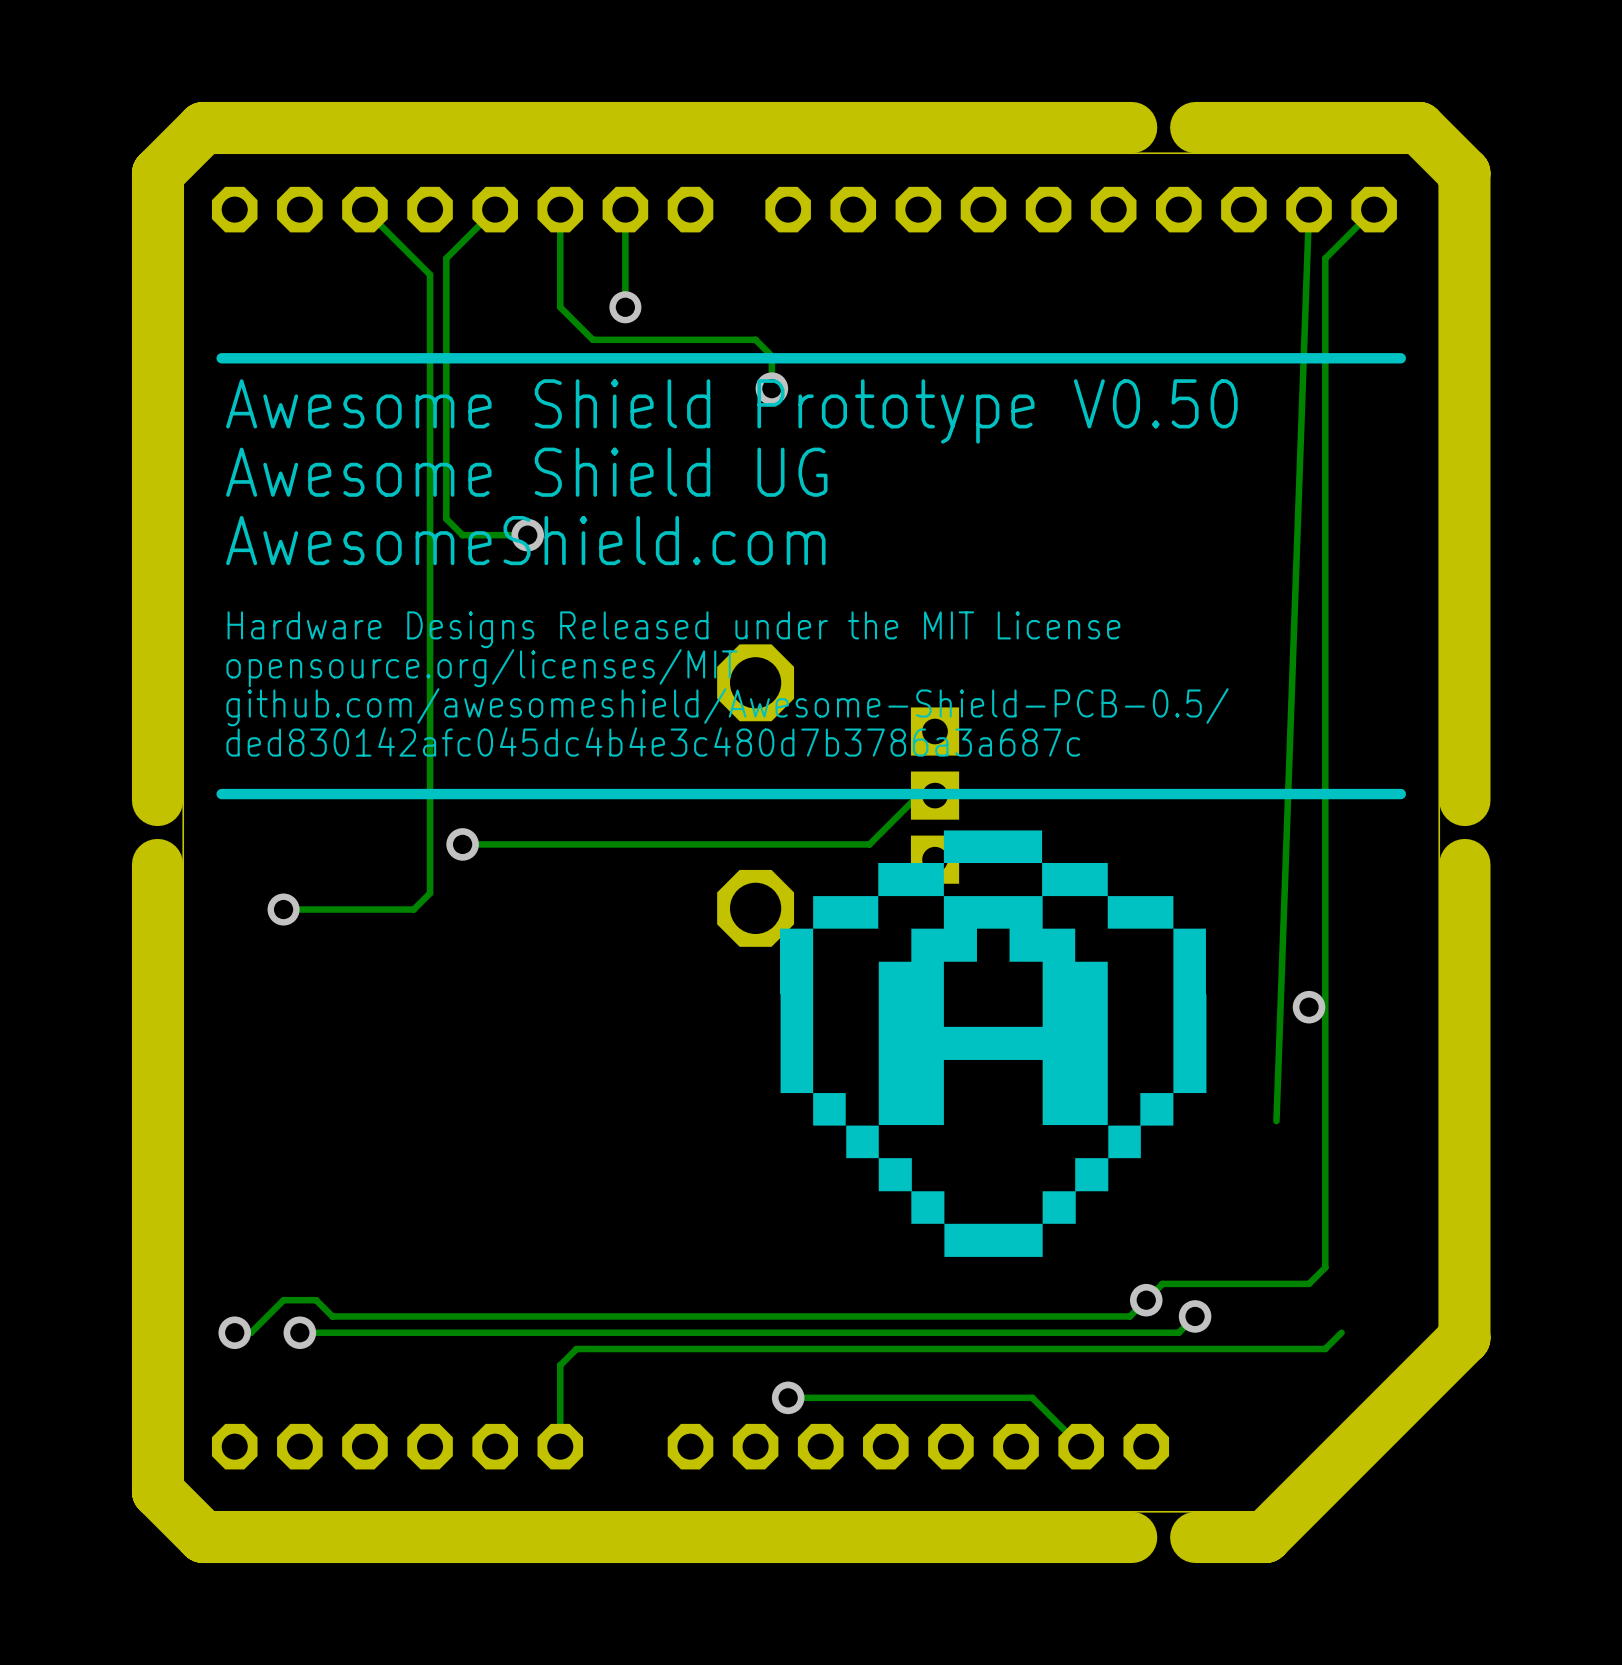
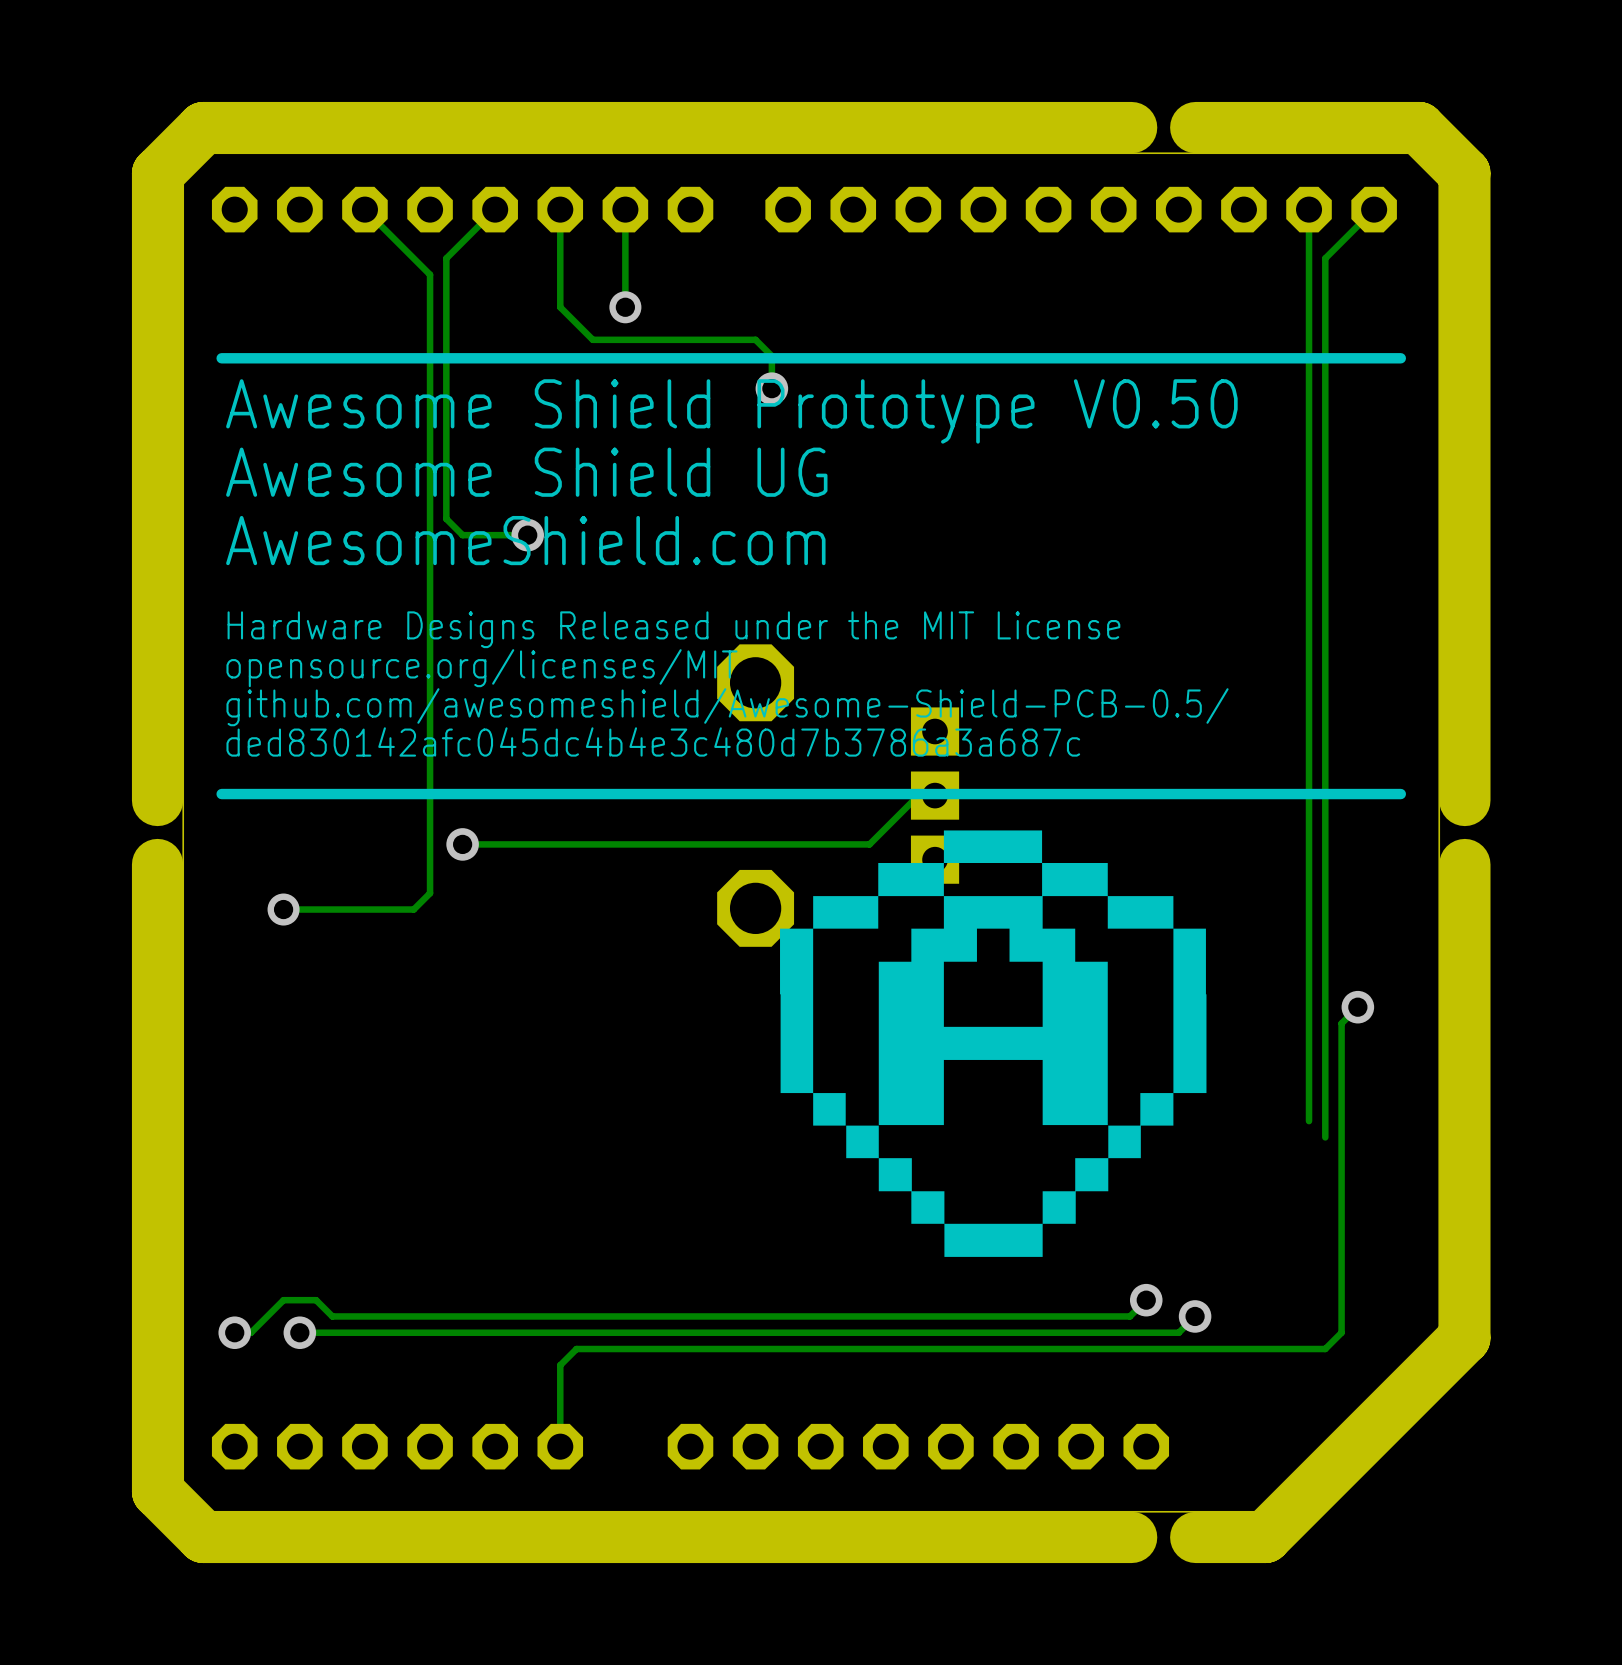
track: (1309, 209) (1276, 1121) -> (1309, 209) (1309, 1121)
via position: (1309, 1007) -> (1357, 1007)
track: none -> (1357, 1007) (1341, 1023) (1341, 1332)
track: (1325, 1137) (1325, 1267) (1309, 1283) (1162, 1283) (1146, 1300) -> none
track: (788, 1397) (1032, 1397) (1081, 1446) -> none
via: (788, 1397) -> none

